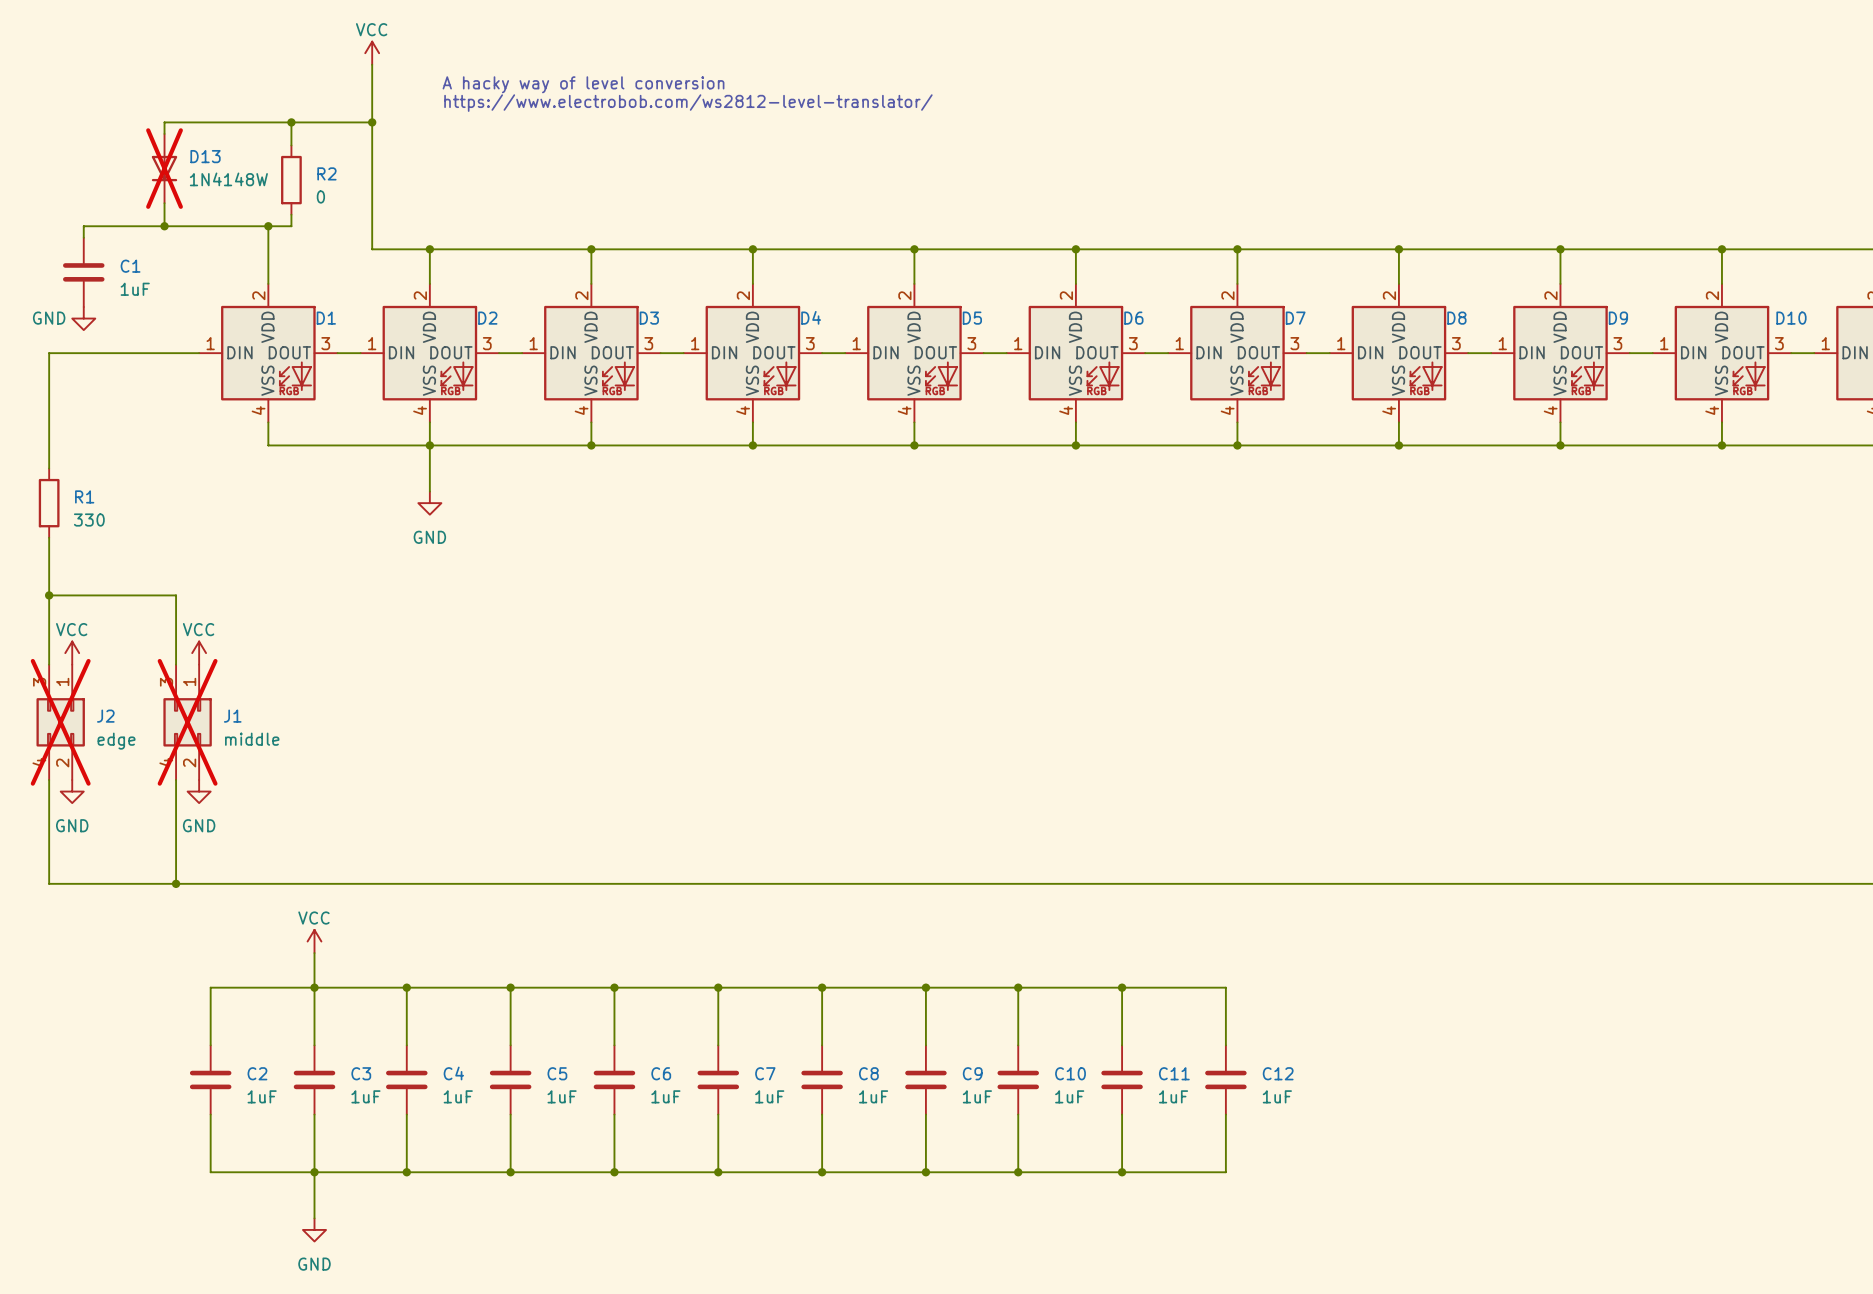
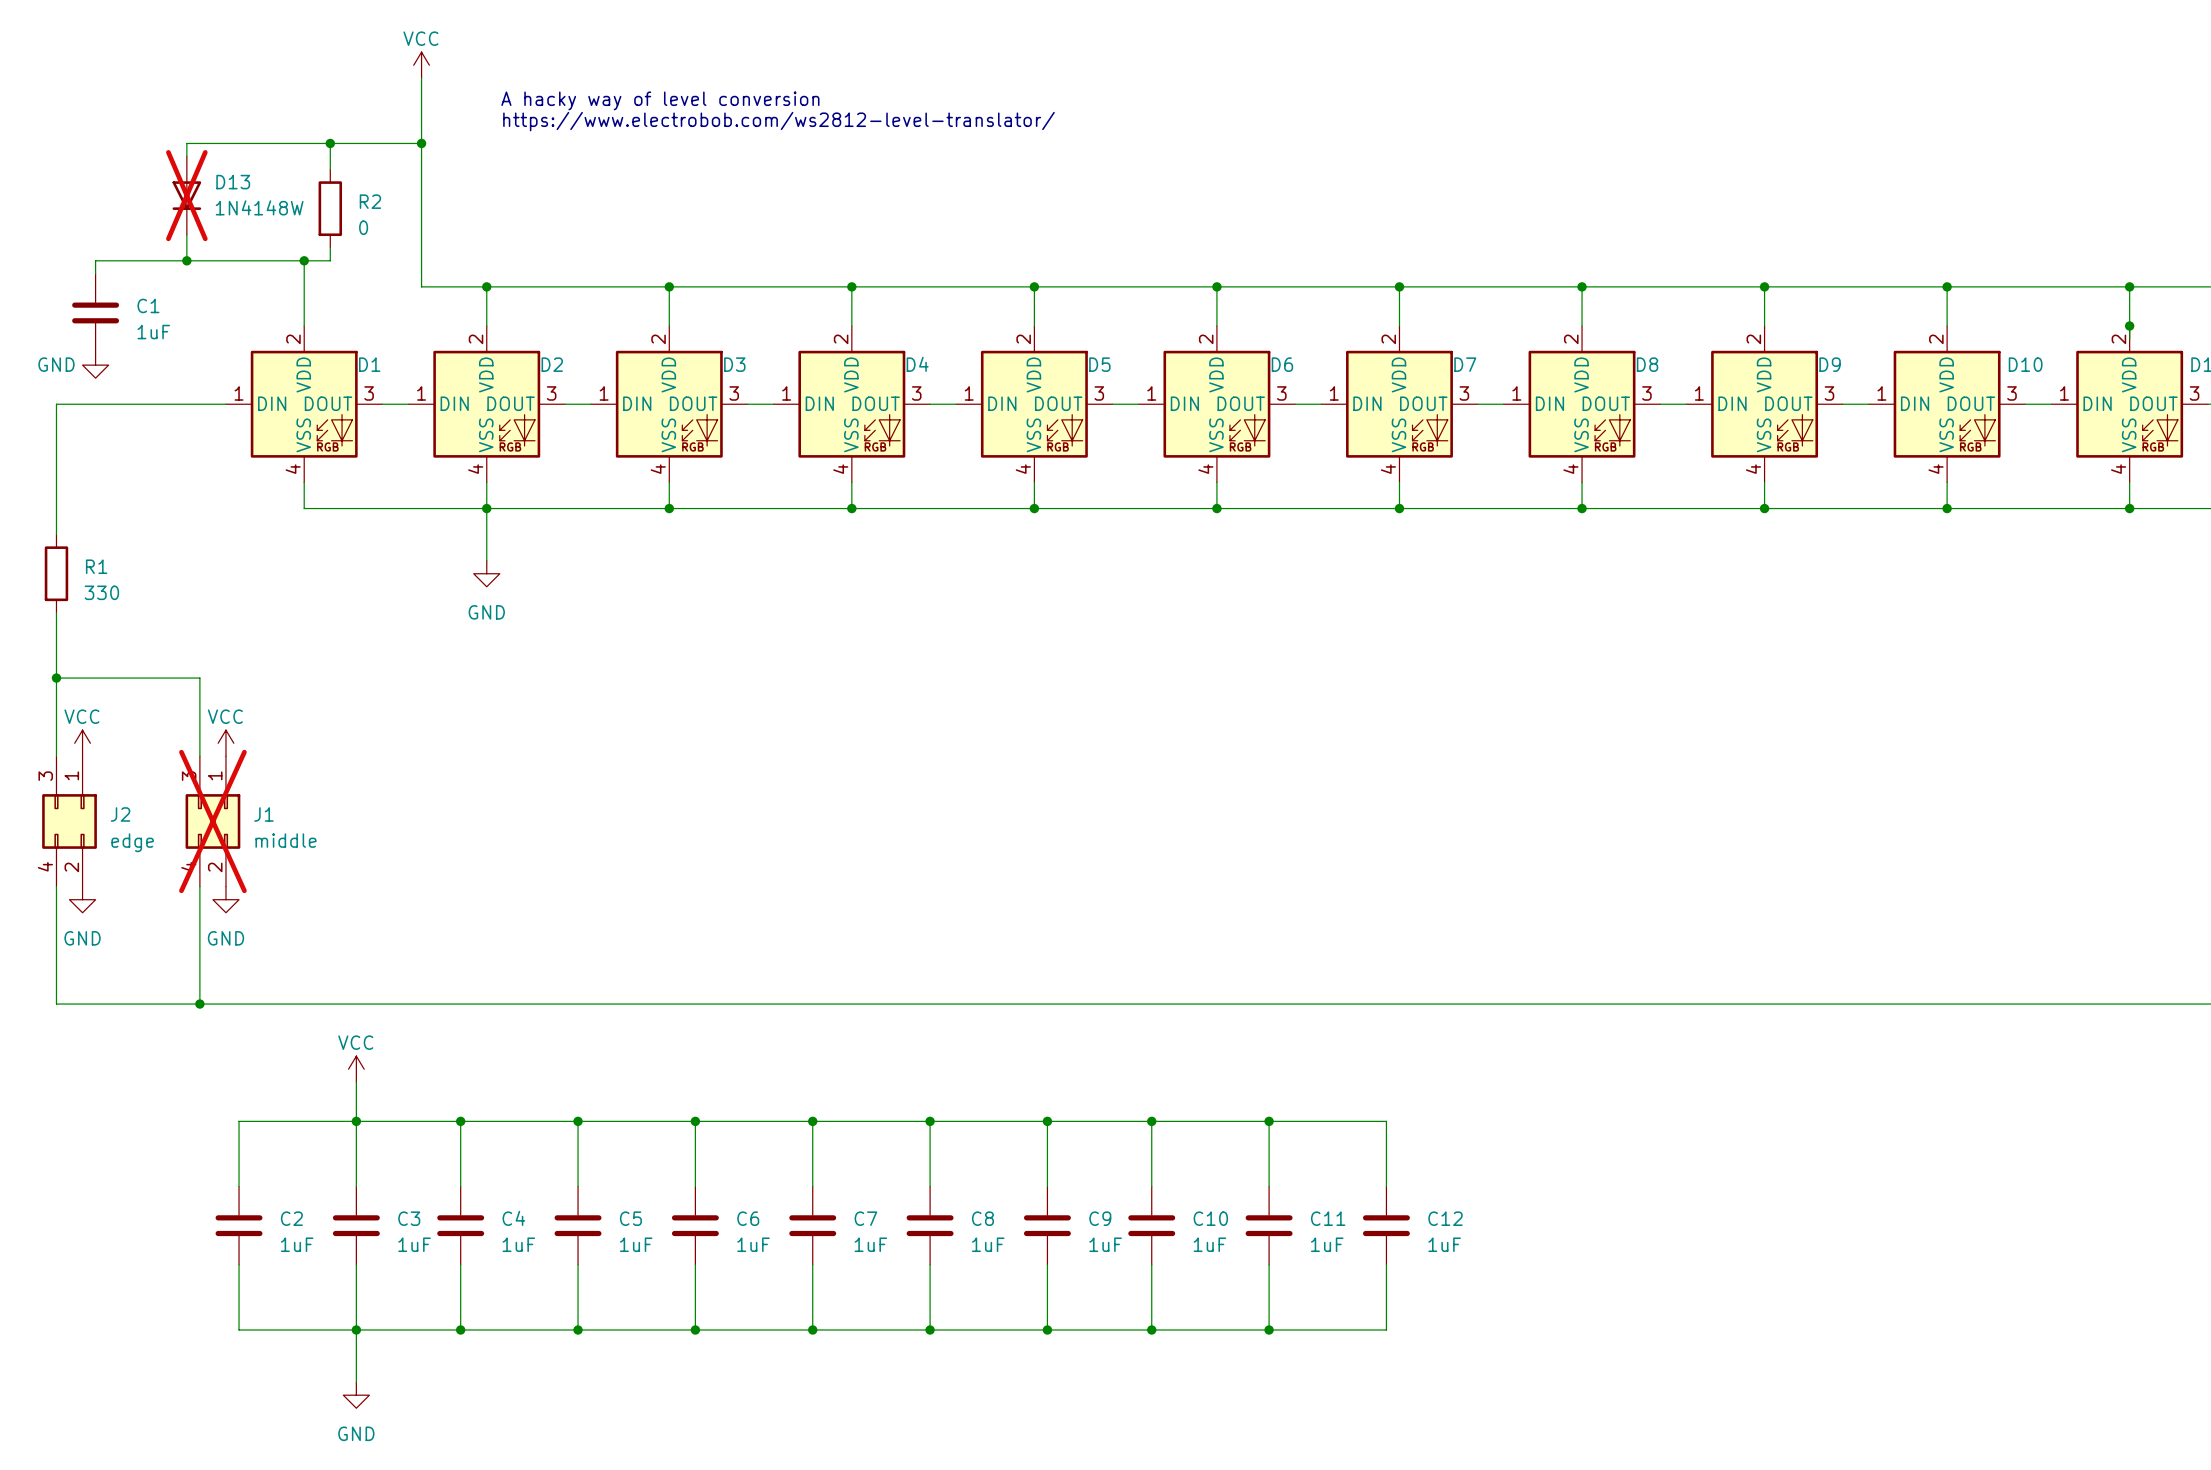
J2 do-not-place cross: (60, 722) -> none

